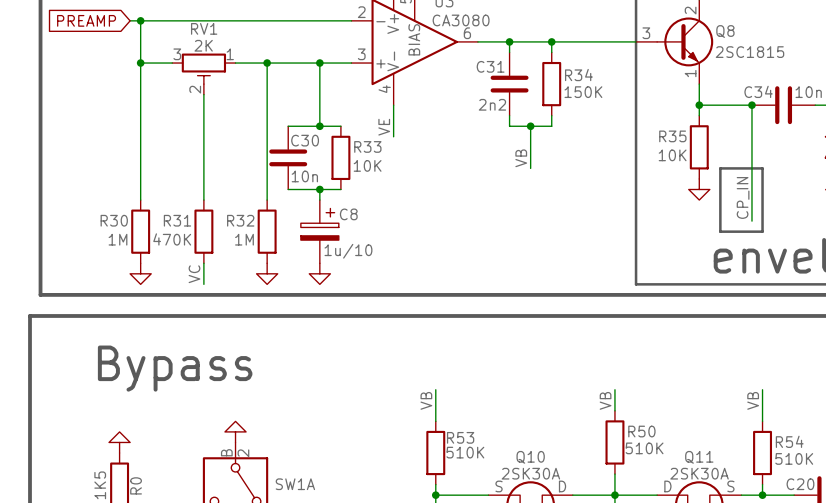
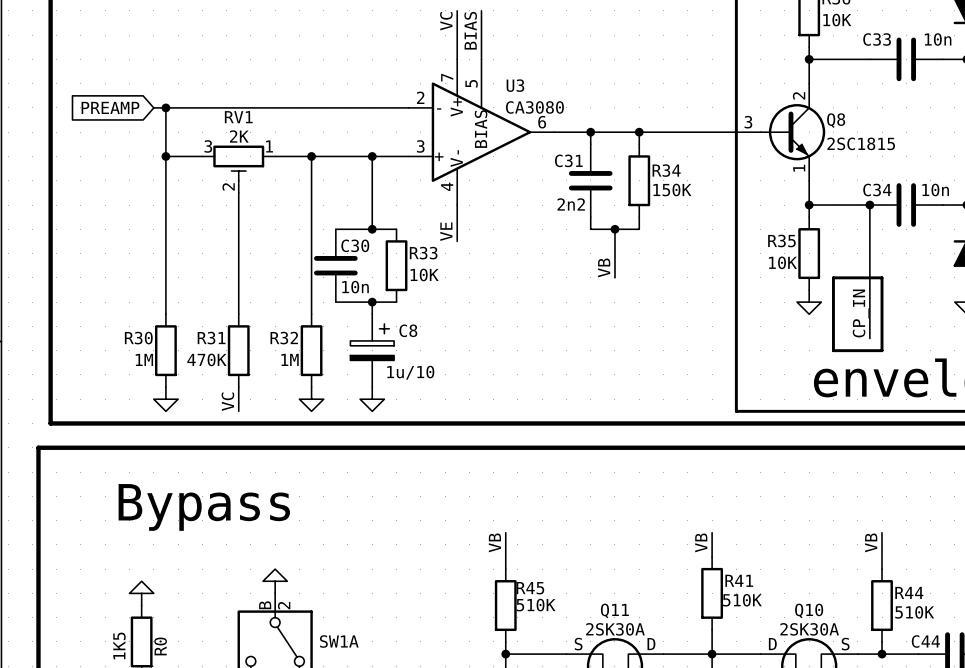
R50 name: R50 (641, 431) -> R41 (739, 580)
R53 name: R53 (460, 437) -> R45 (530, 588)
R54 name: R54 (789, 441) -> R44 (909, 592)
Q10 name: Q10 (530, 457) -> Q11 (614, 610)
Q11 name: Q11 (699, 457) -> Q10 (809, 610)
C20 name: C20 (800, 484) -> C44 (925, 641)

